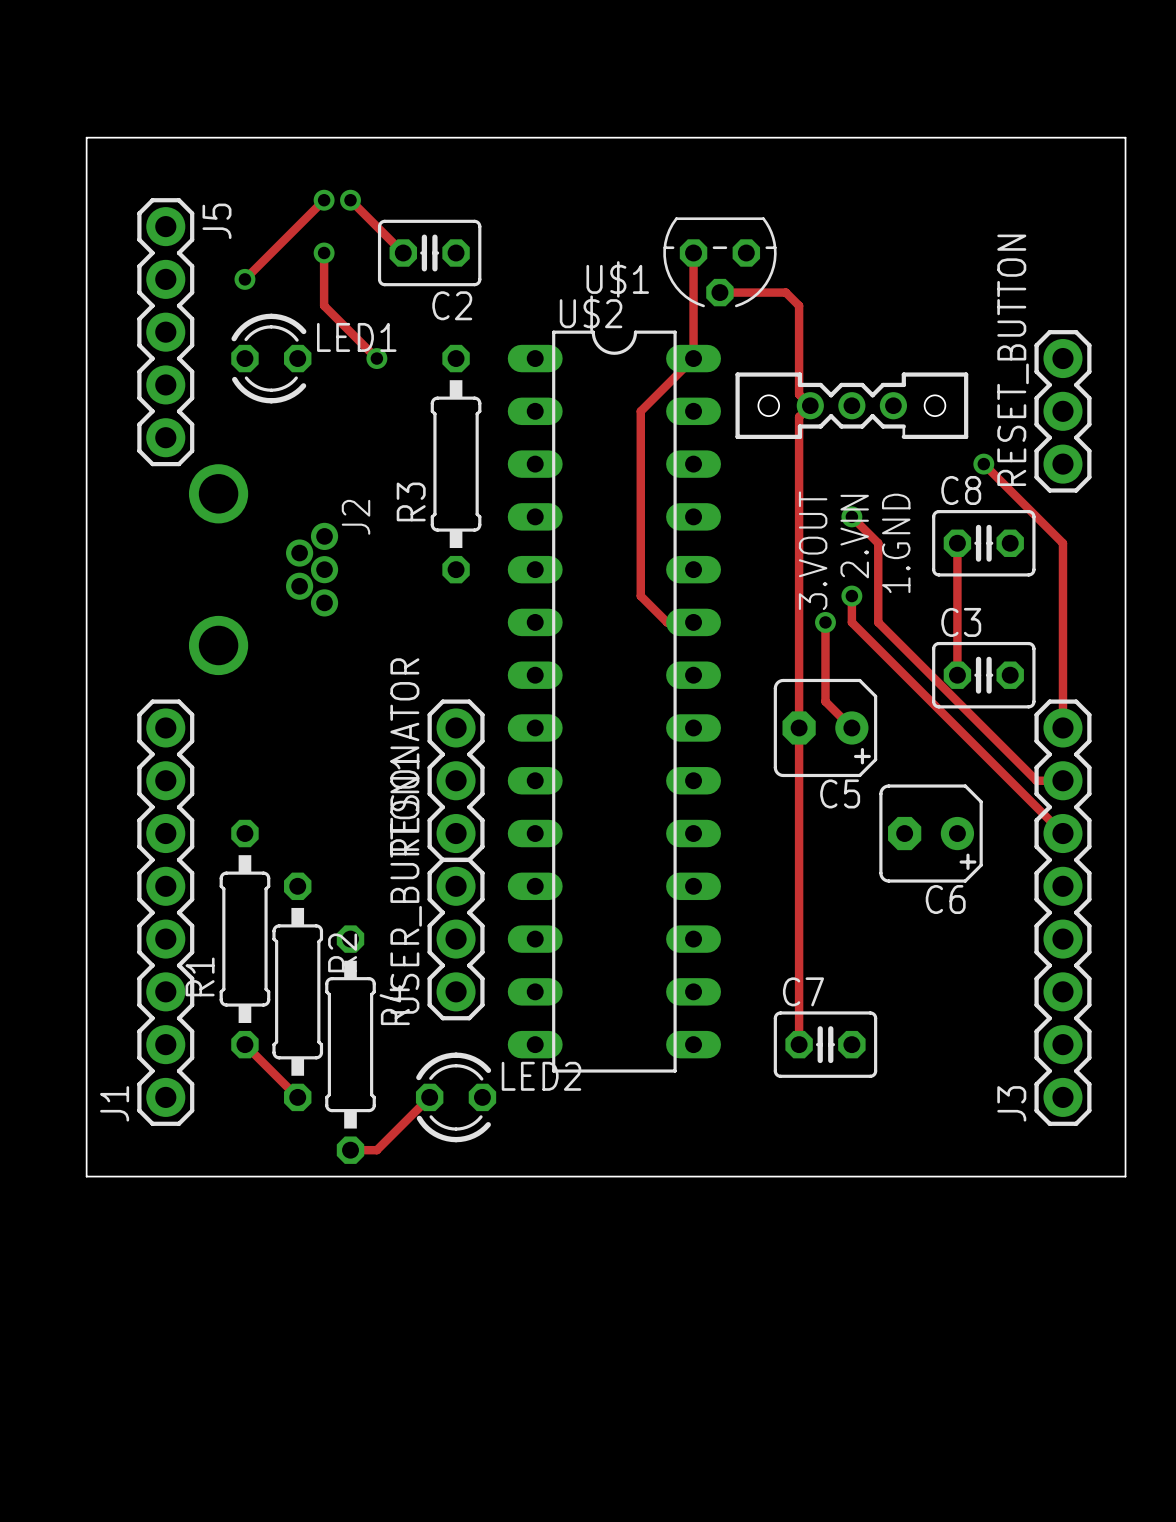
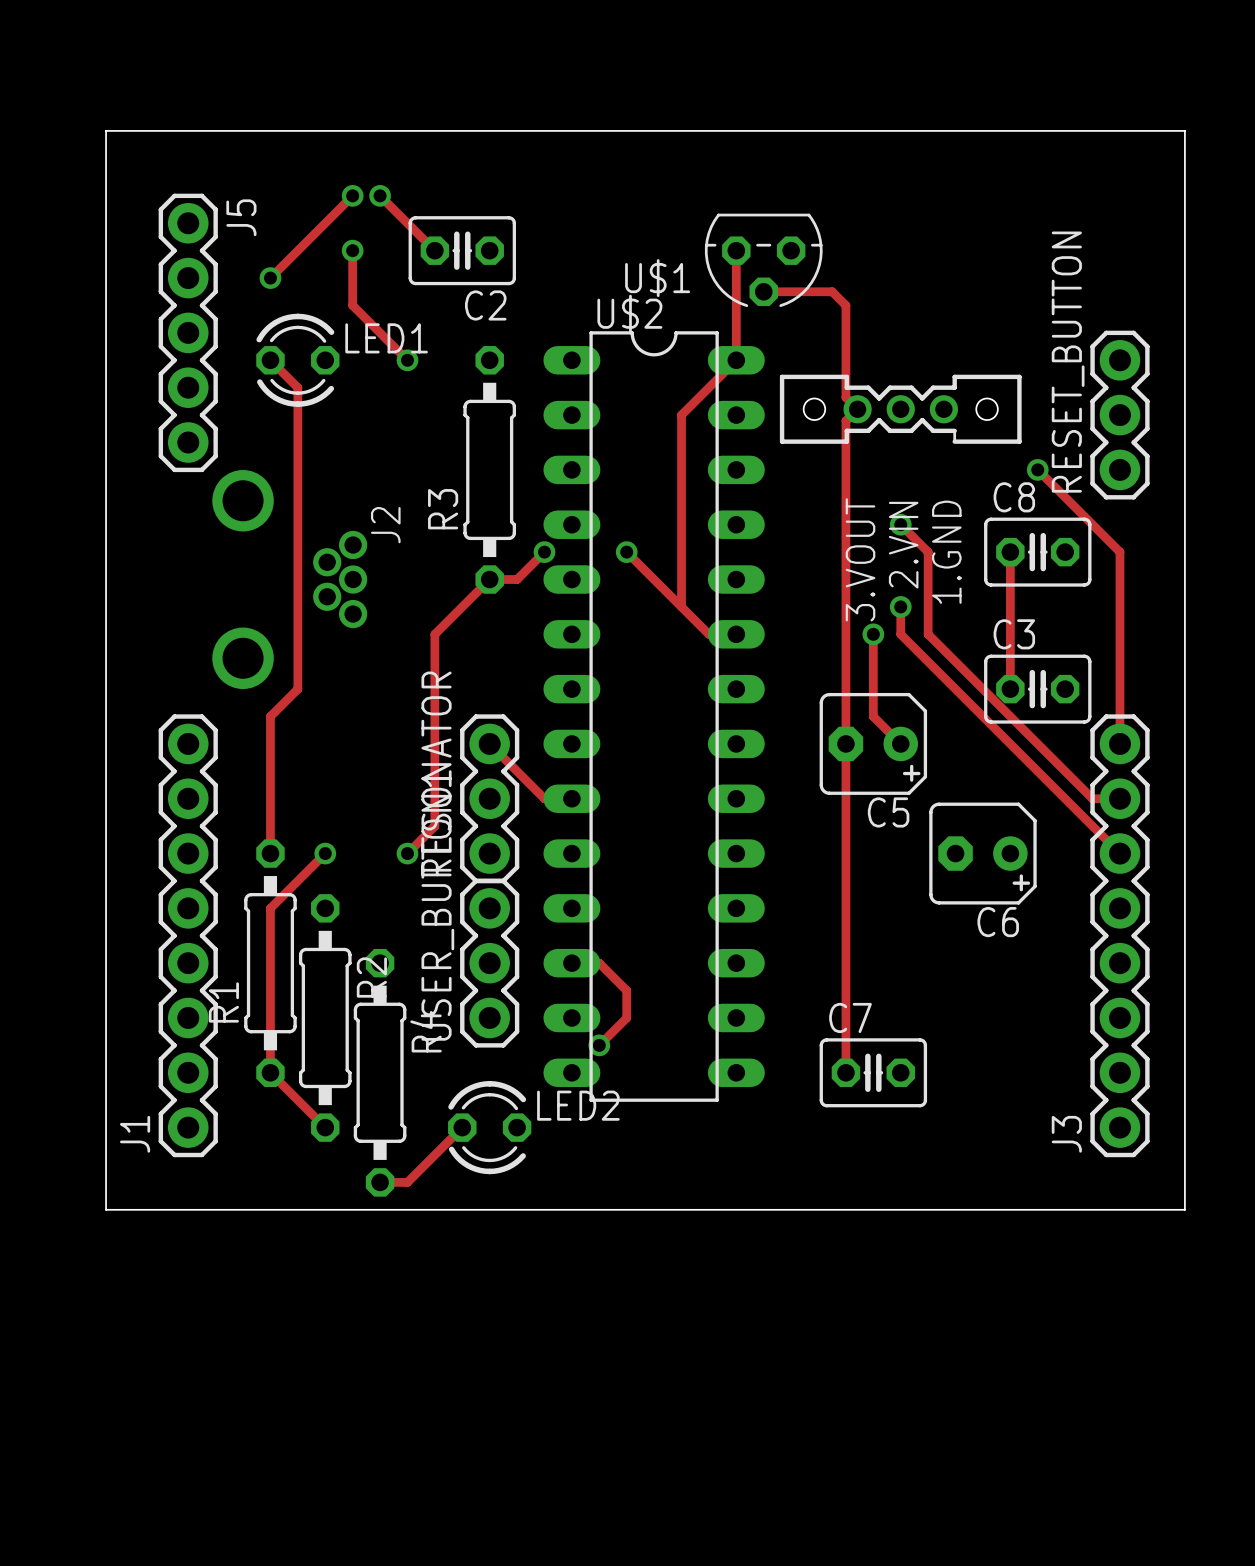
track: none -> (270, 360) (297, 387) (297, 689) (270, 716) (270, 853)
track: none -> (544, 552) (517, 579) (489, 579) (434, 634) (434, 826) (407, 853)
via: none -> (544, 552)
track: none -> (626, 552) (681, 606)
via: none -> (626, 552)
track: none -> (489, 743) (544, 798) (571, 798)
track: none -> (325, 853) (270, 908) (270, 1072)
via: none -> (325, 853)
via: none -> (407, 853)
track: none -> (571, 963) (599, 963) (626, 990) (626, 1017) (599, 1045)
via: none -> (599, 1045)

